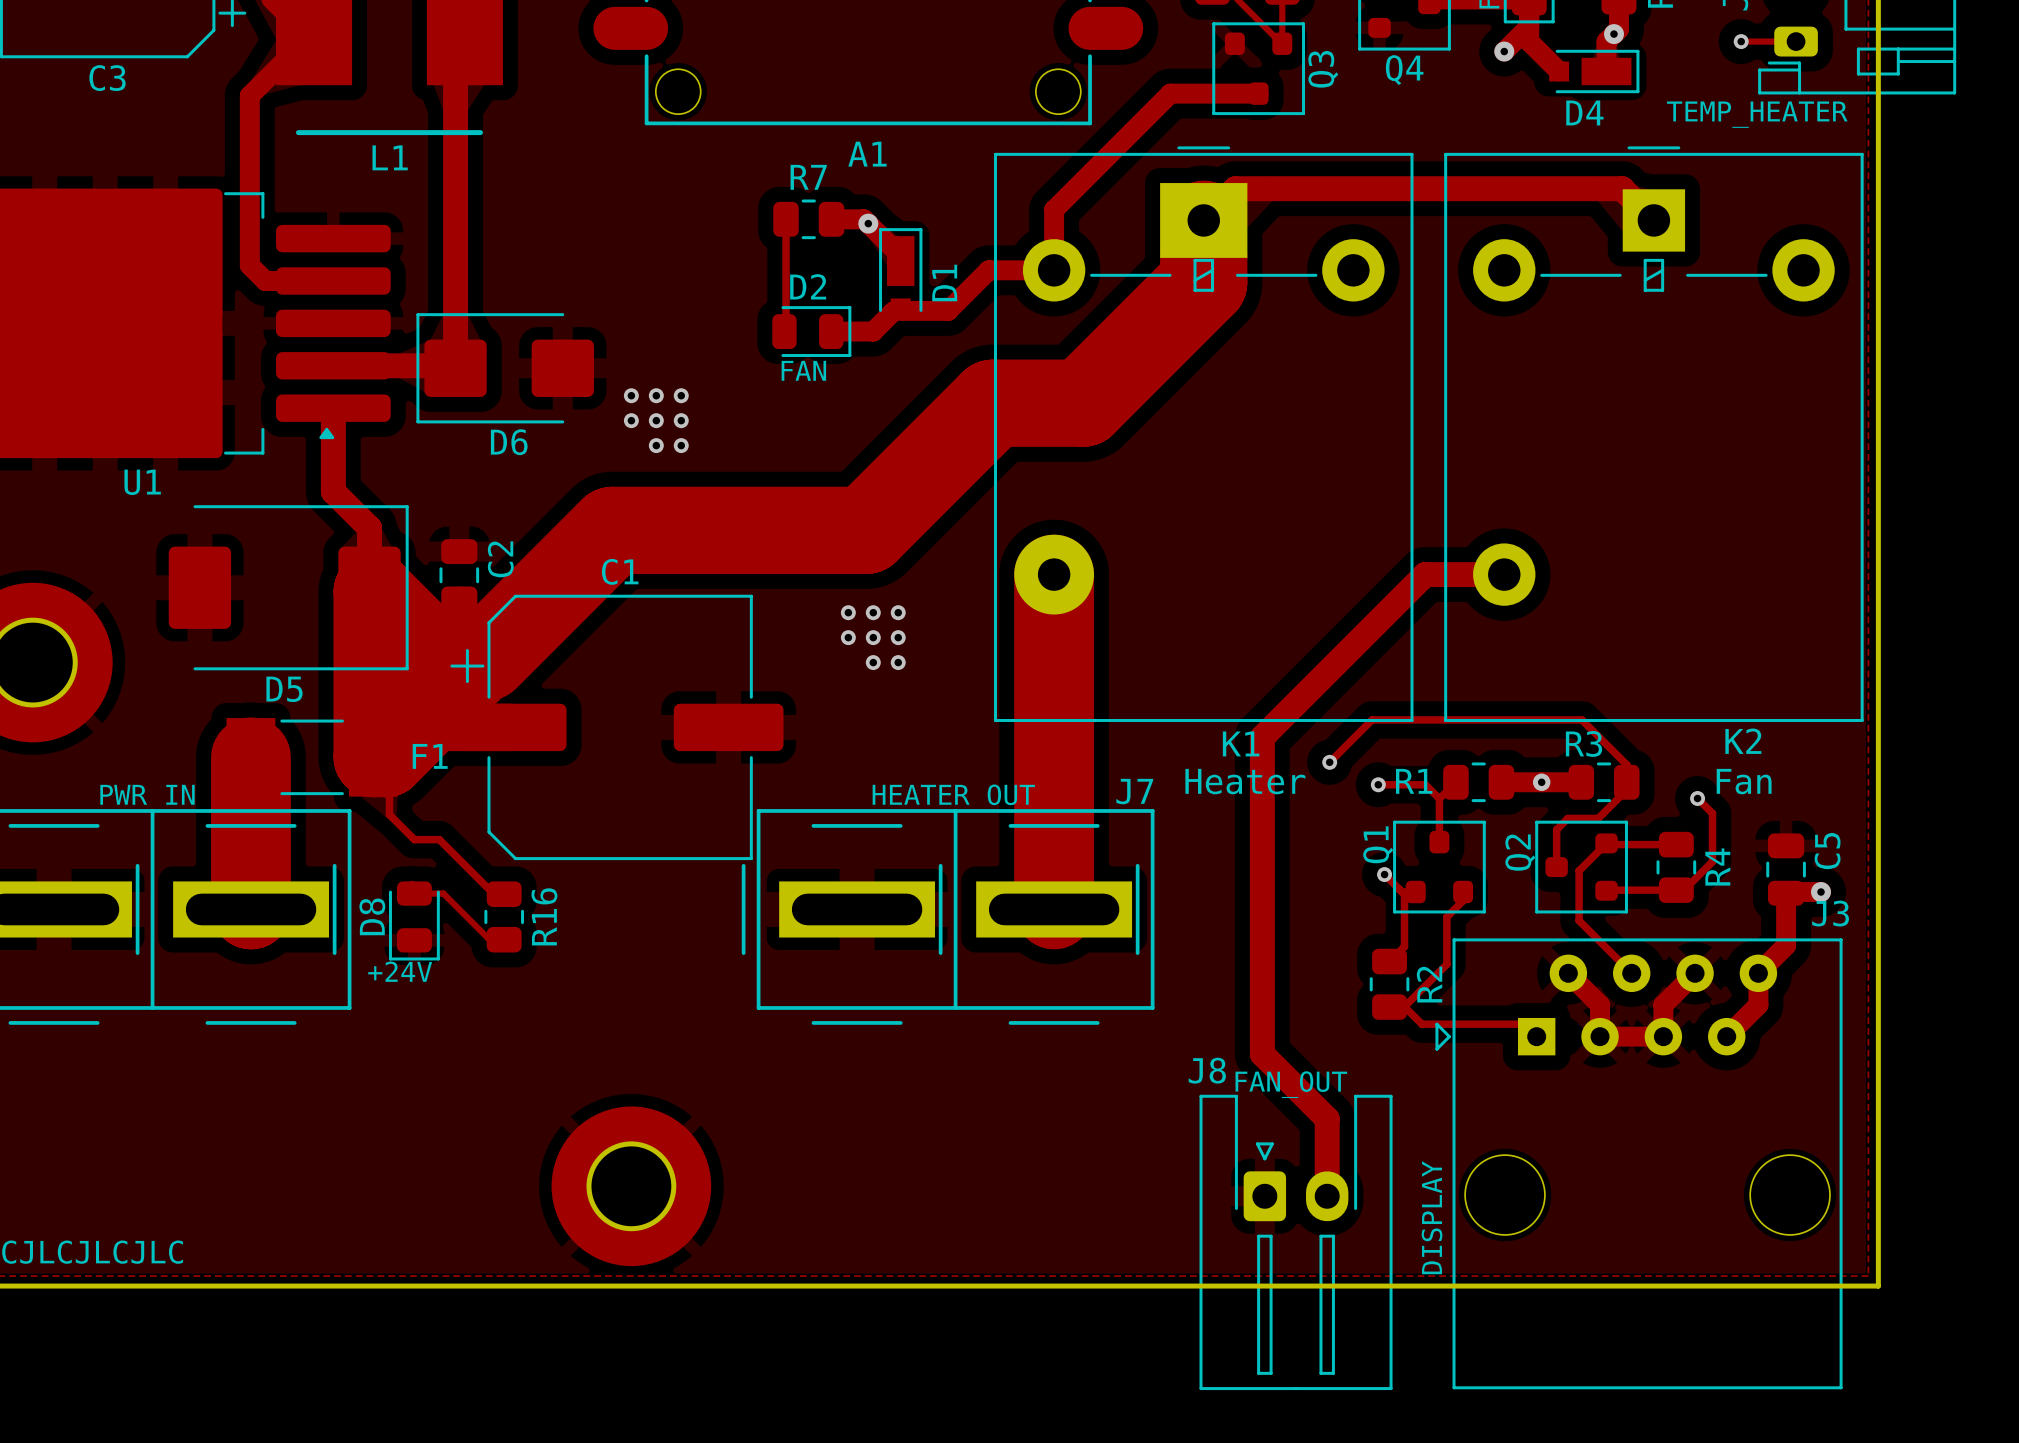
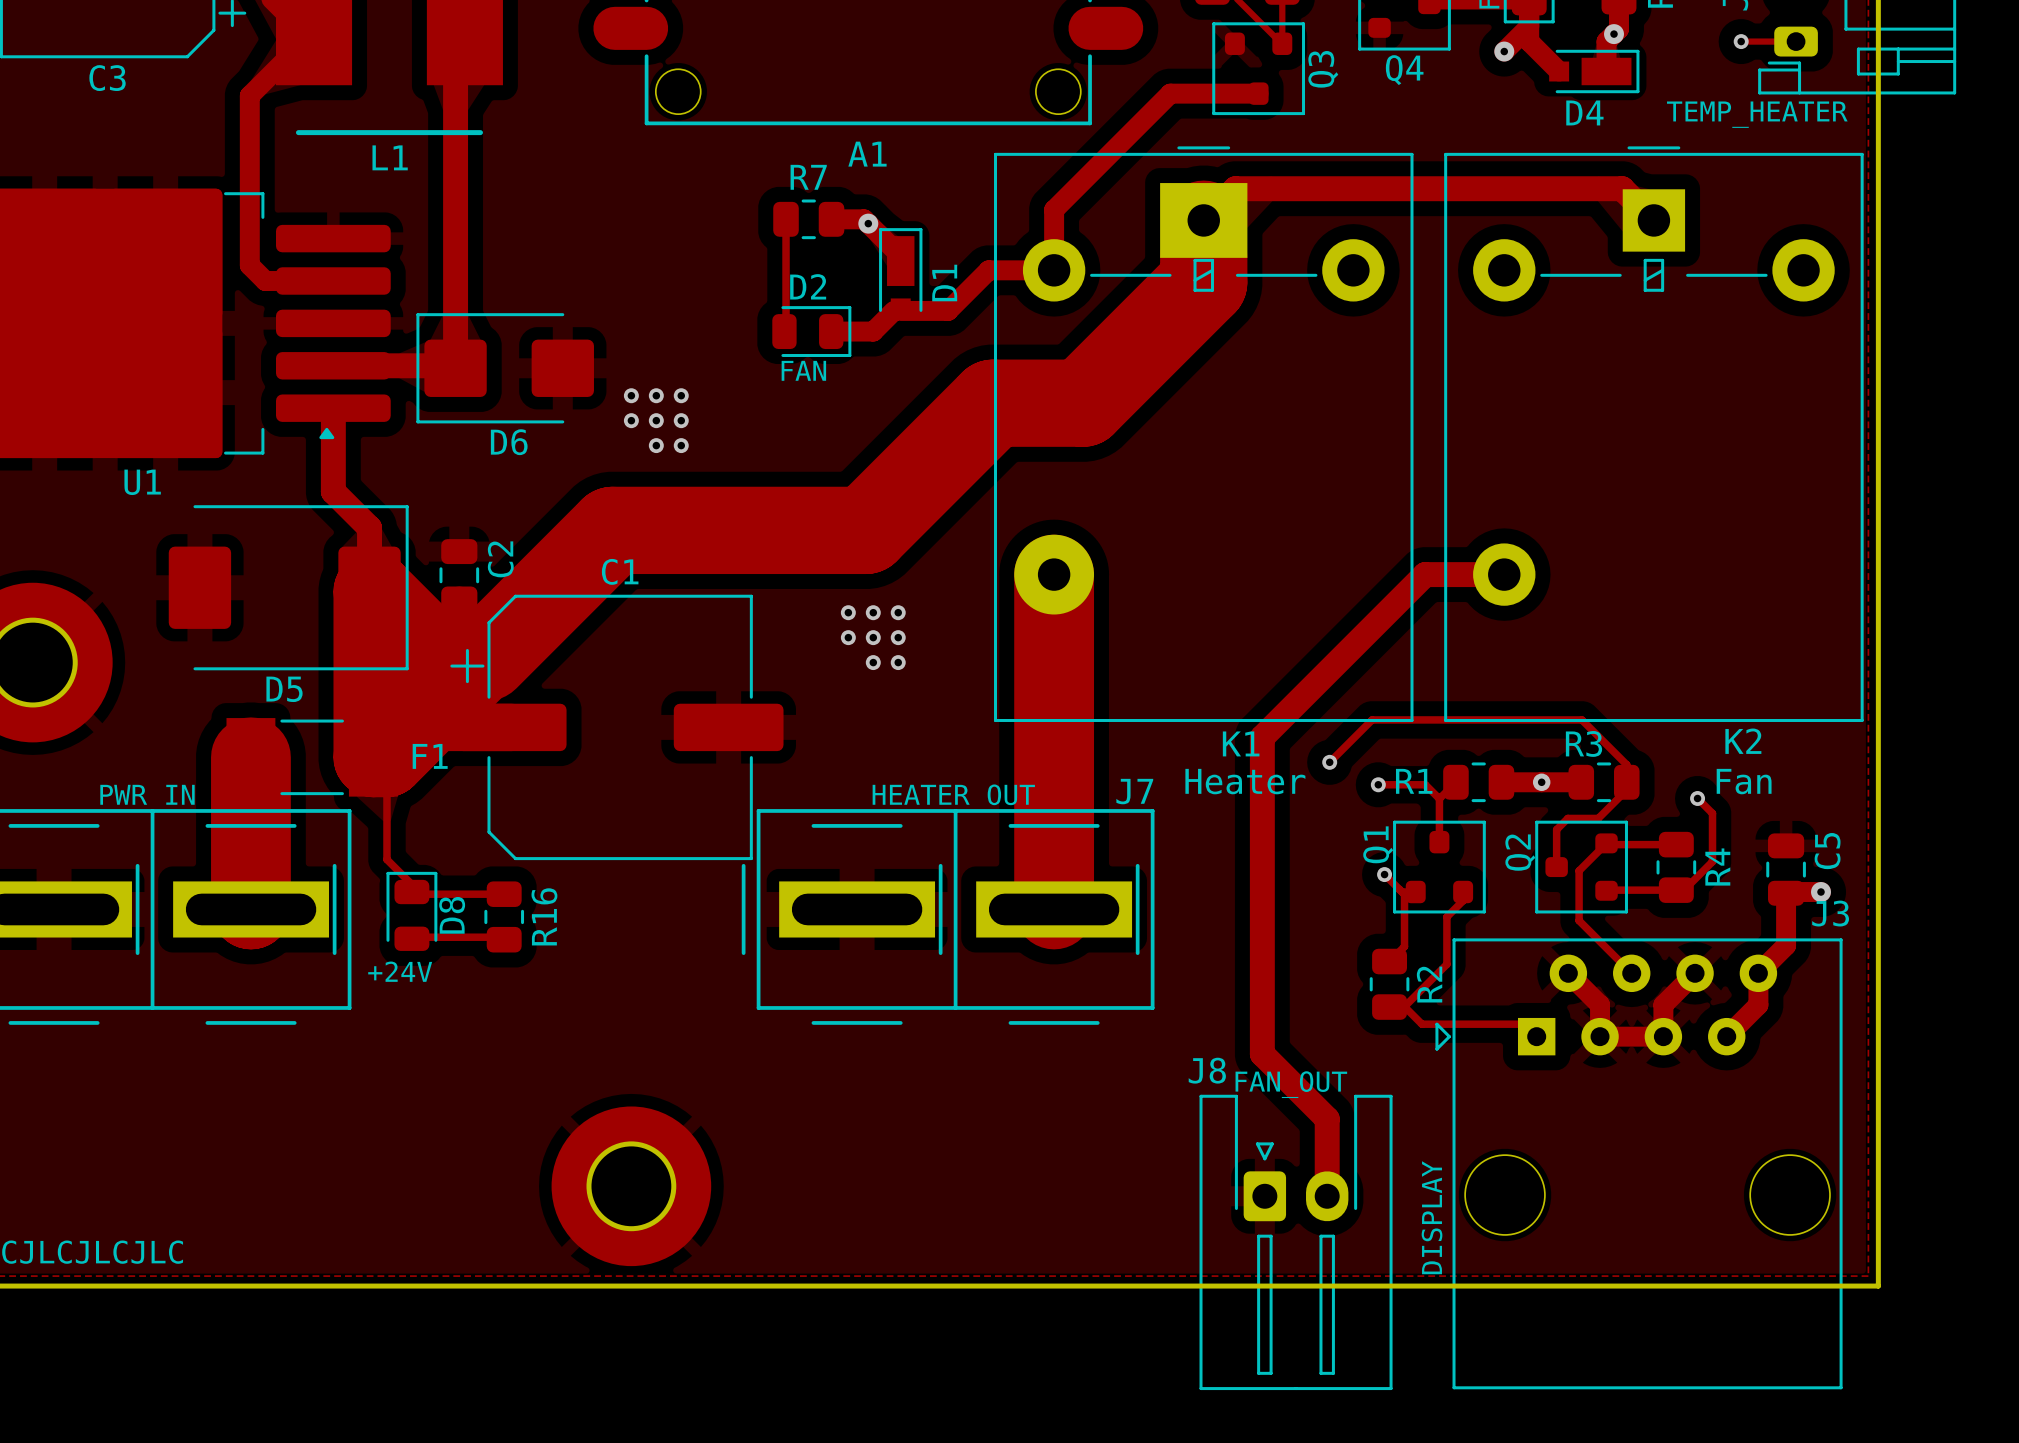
track: (386, 770) (389, 773) (389, 814) (414, 839) (439, 839) (493, 894) -> (386, 770) (386, 859) (411, 884)
track: (414, 893) (443, 893) (489, 939) (504, 939) -> (414, 894) (493, 894)
D8 rotation: 0° (414, 920) -> 180° (411, 911)
track: none -> (412, 937) (506, 937)

